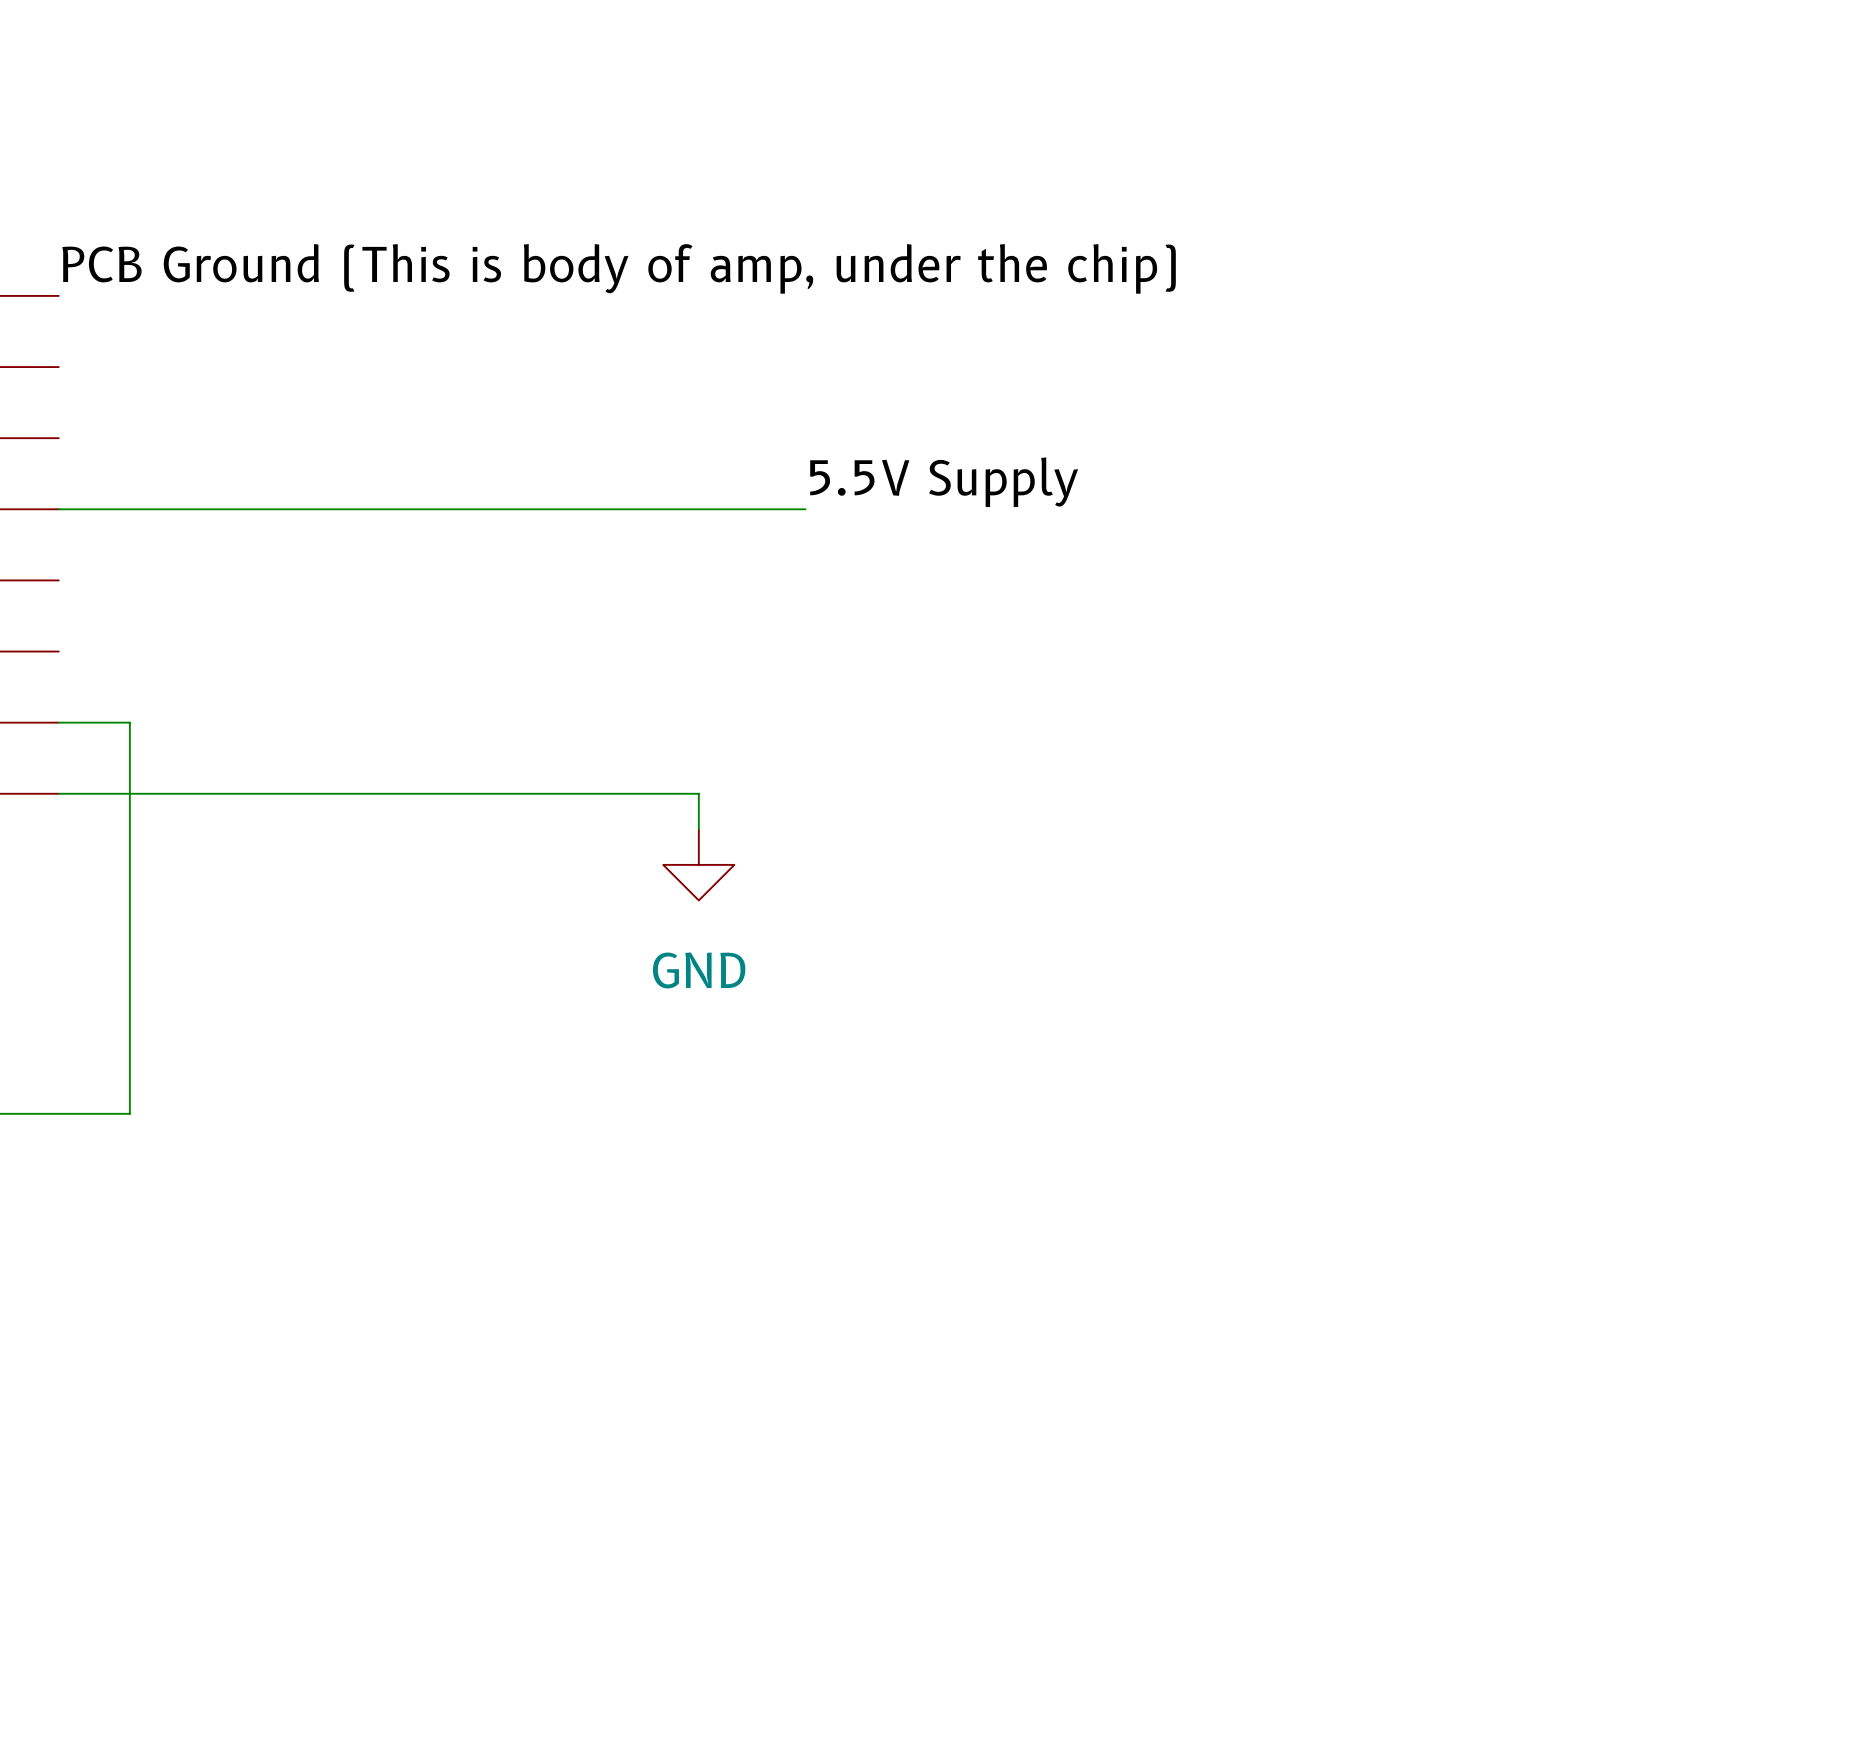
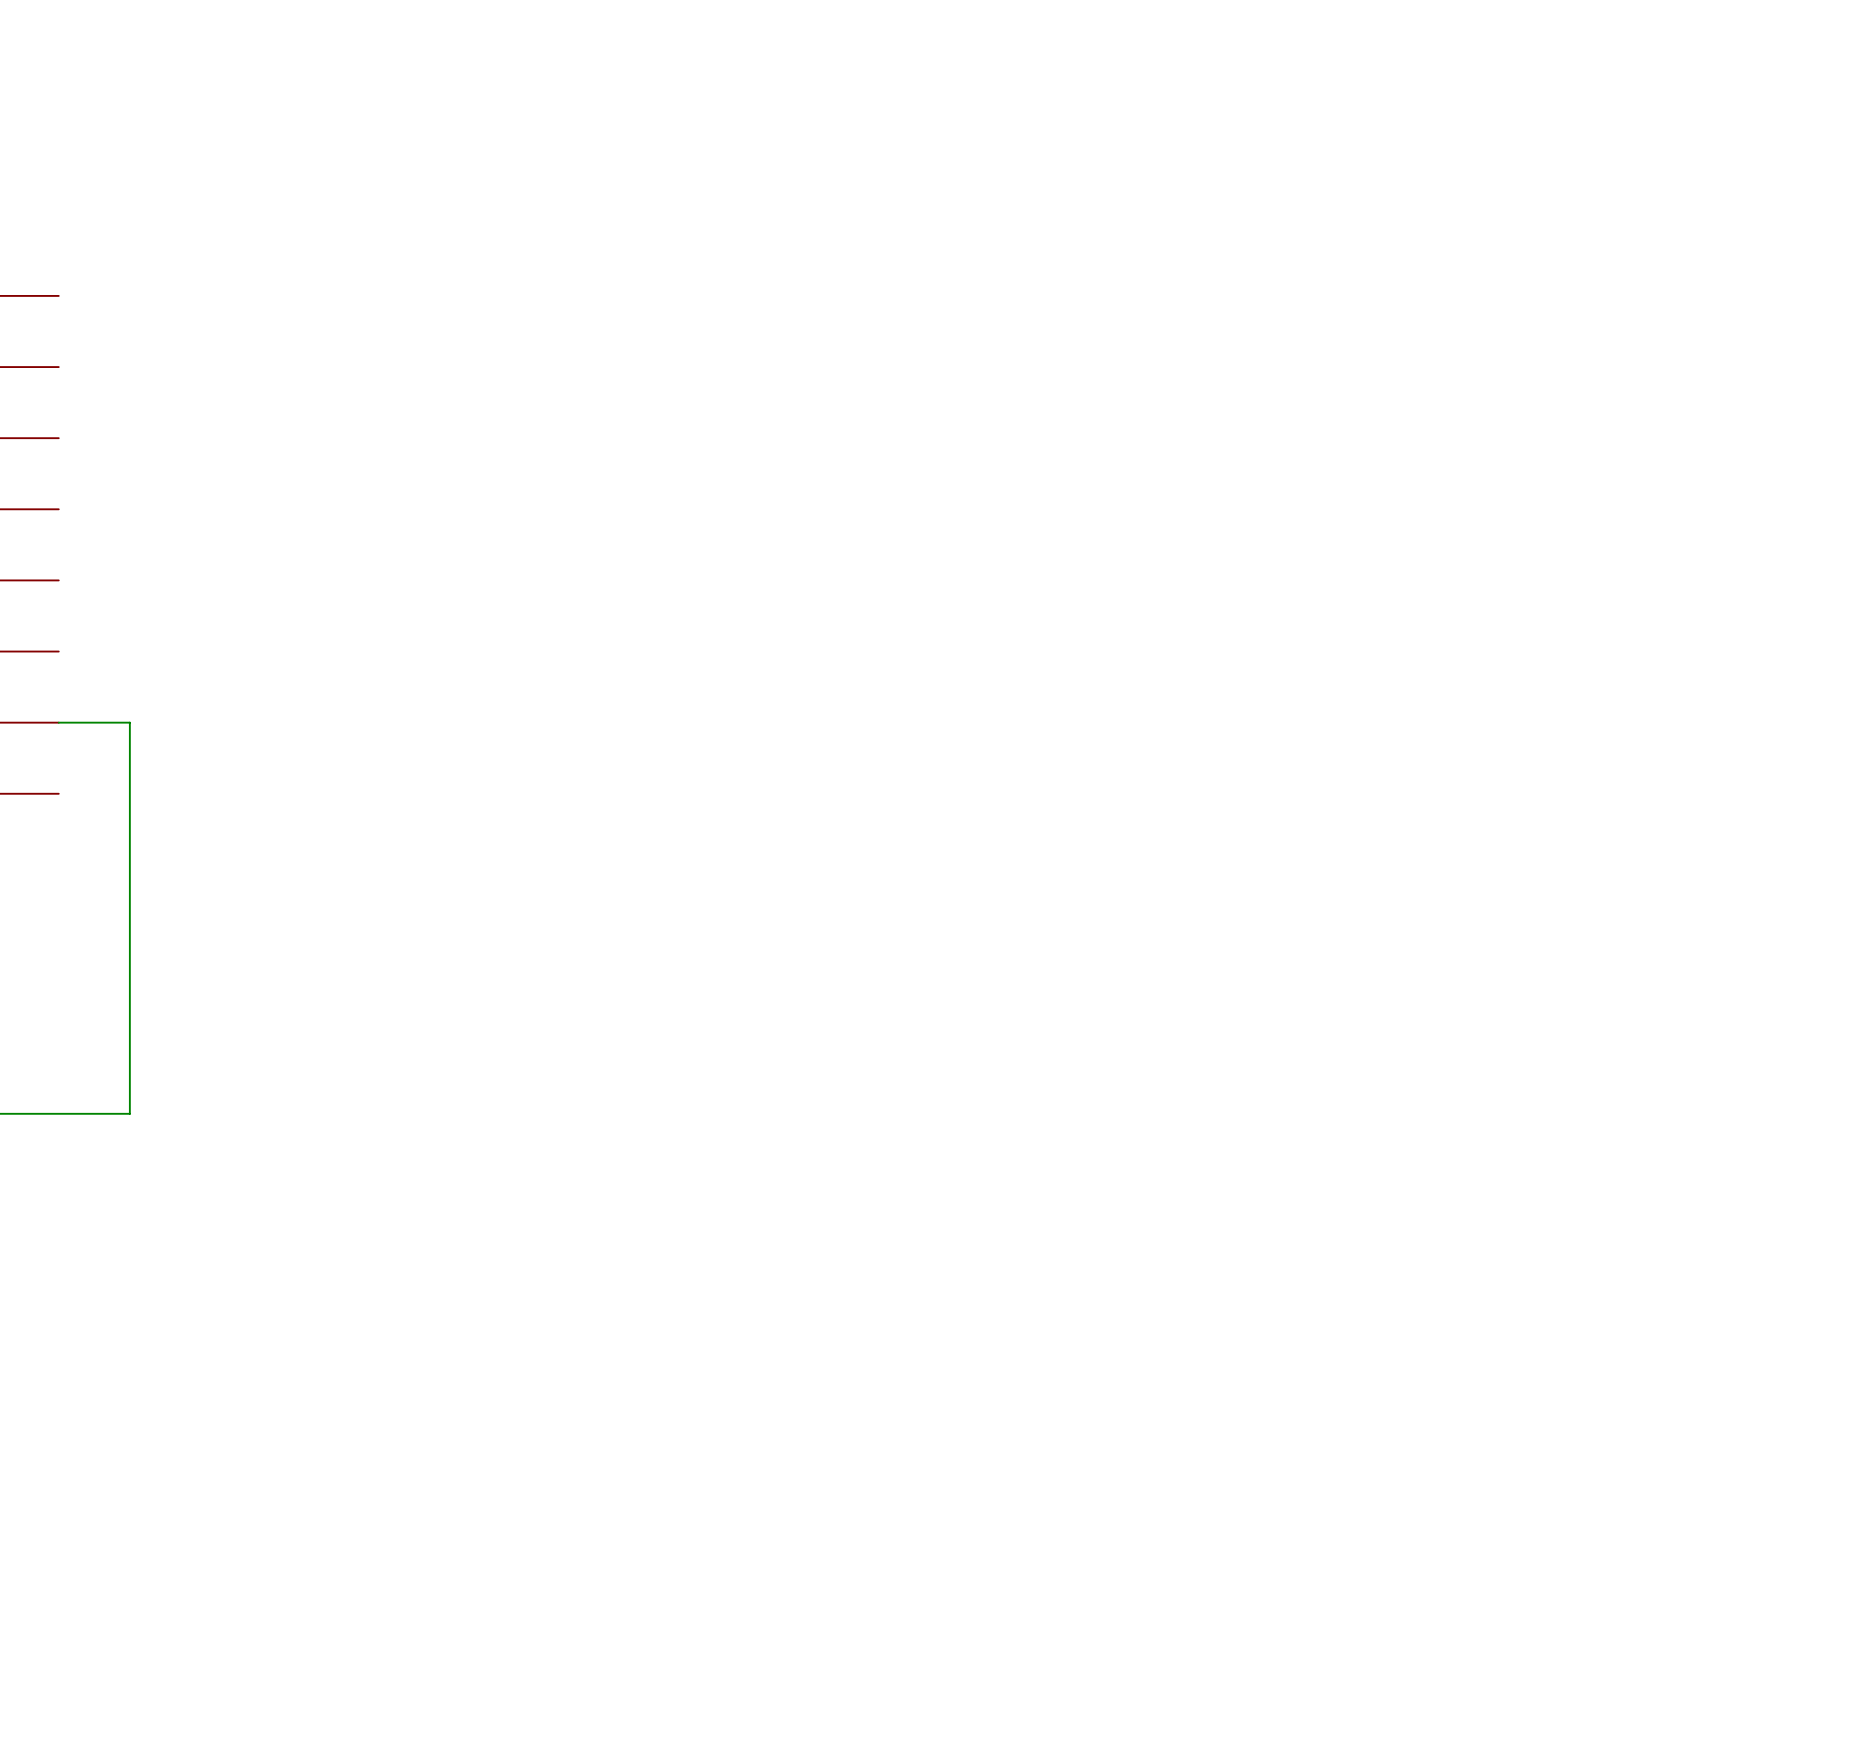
label: PCB Ground (This is body of amp, under the chip) (619, 268) -> none
label: 5.5V Supply (944, 482) -> none
wire: (58, 509) (805, 509) -> none
wire: (58, 793) (698, 793) (698, 829) -> none
power symbol: GND (698, 864) -> none

